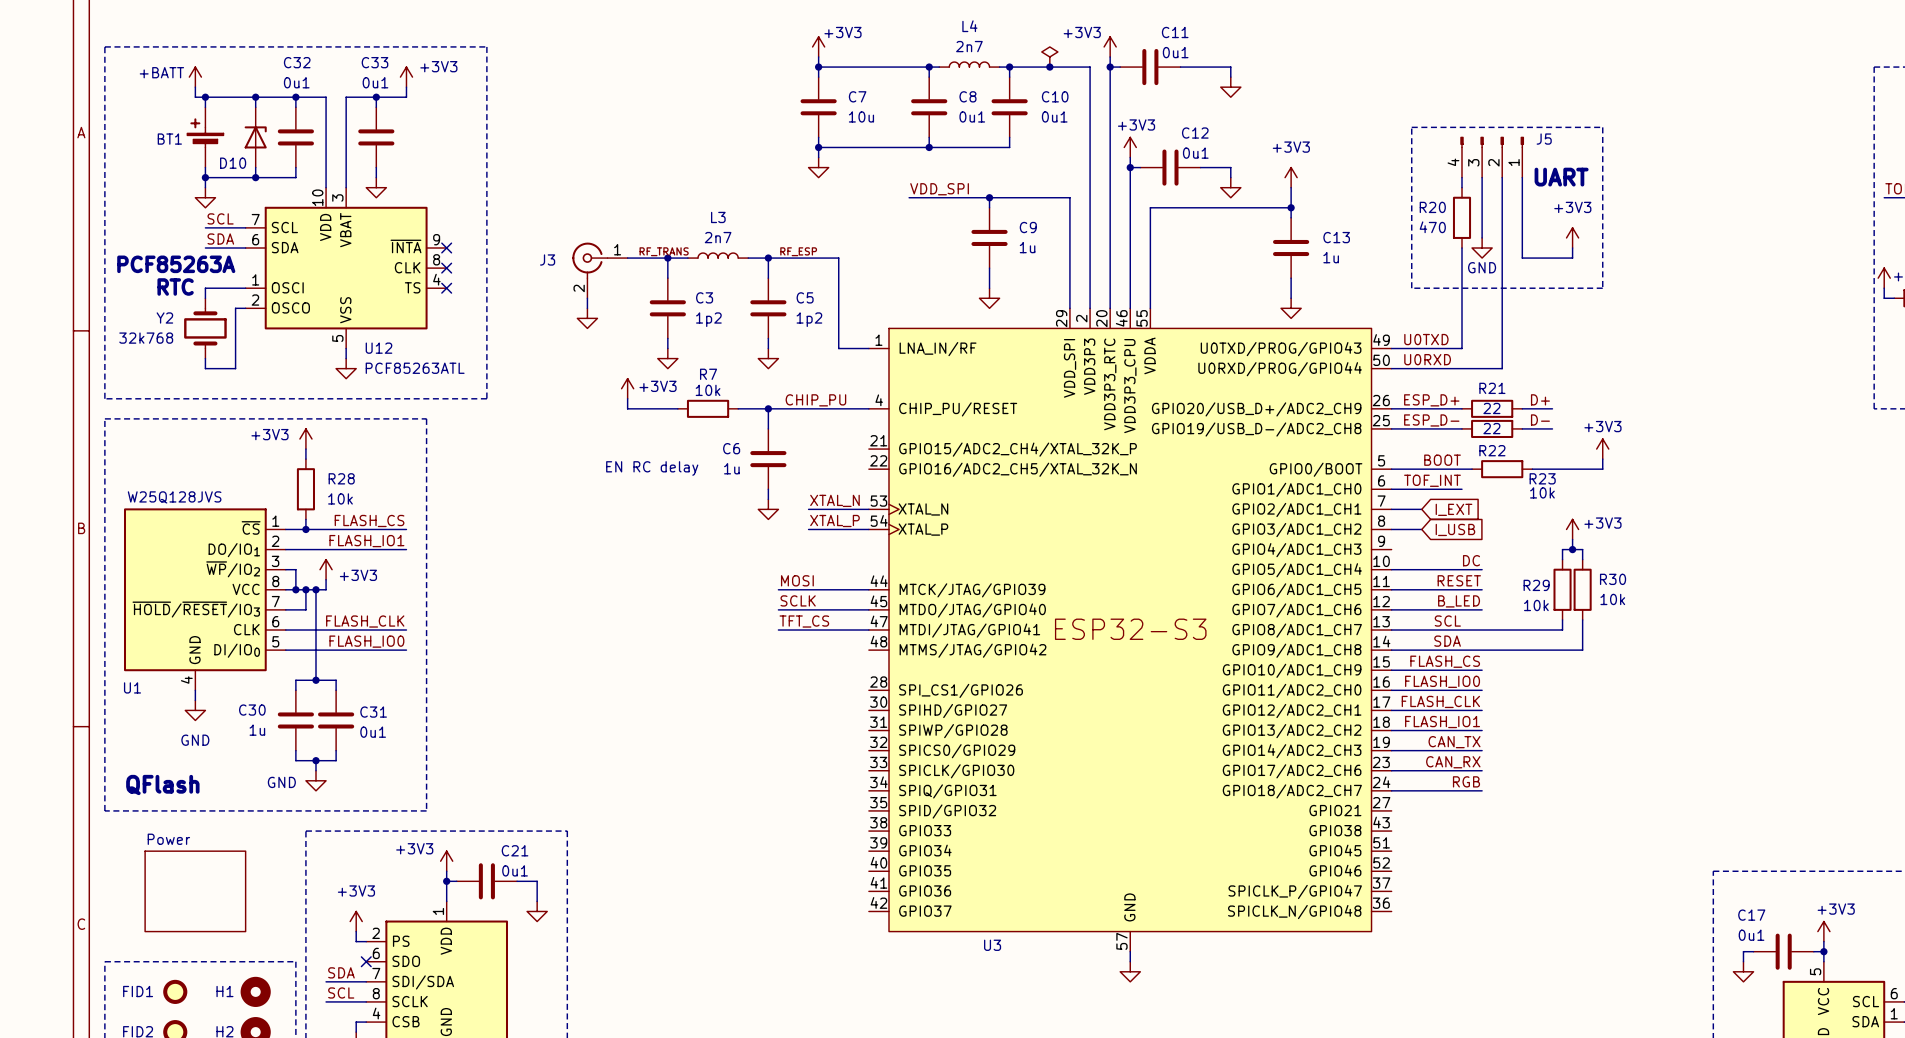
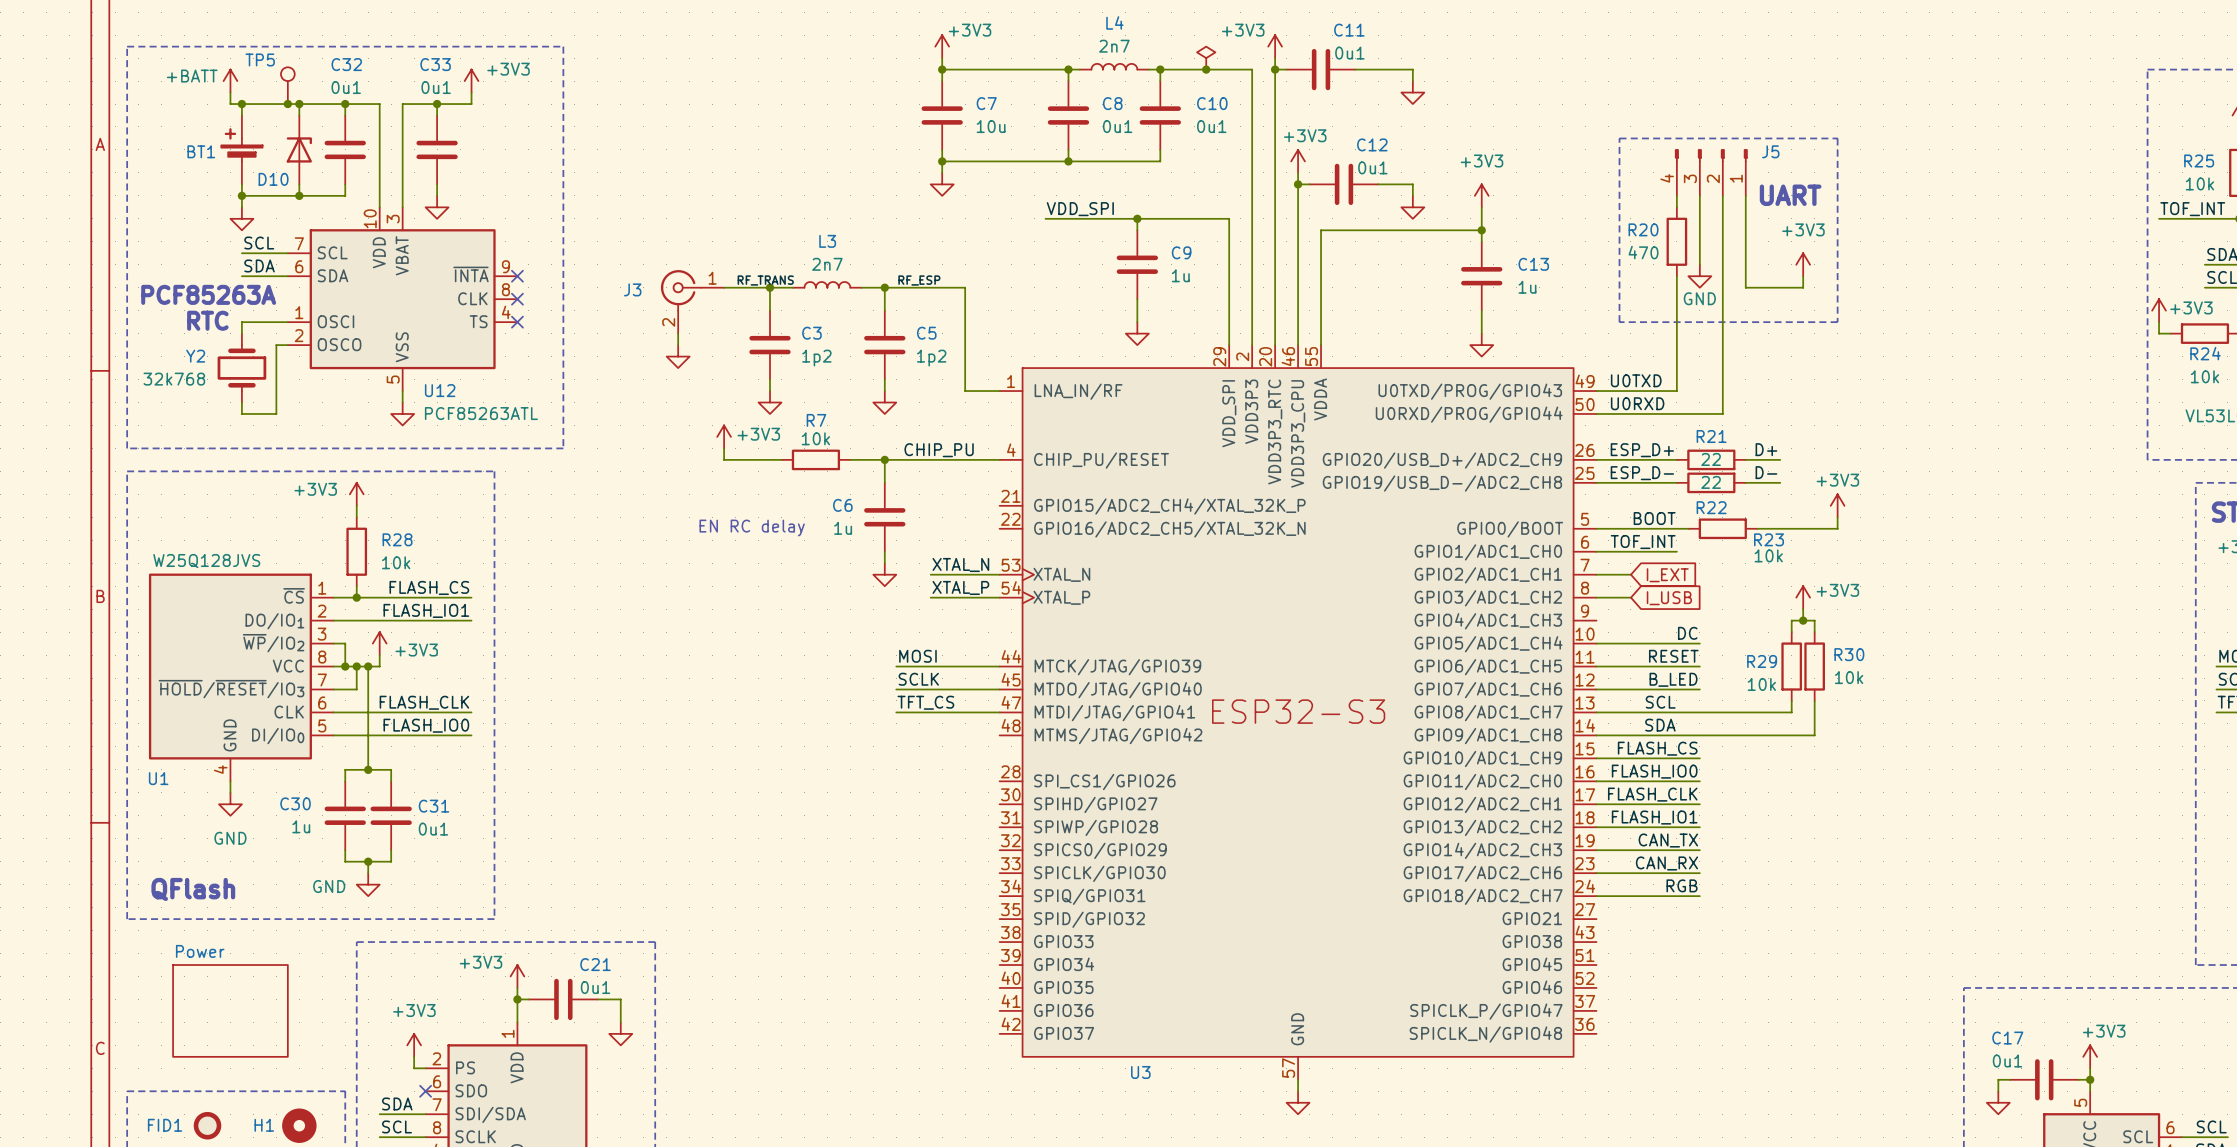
TP5: none -> (287, 85)
junction: none -> (287, 104)

